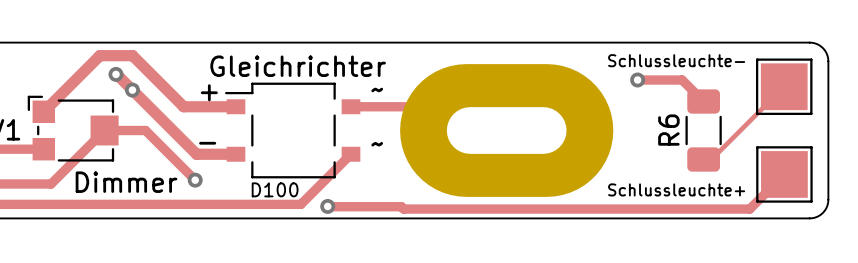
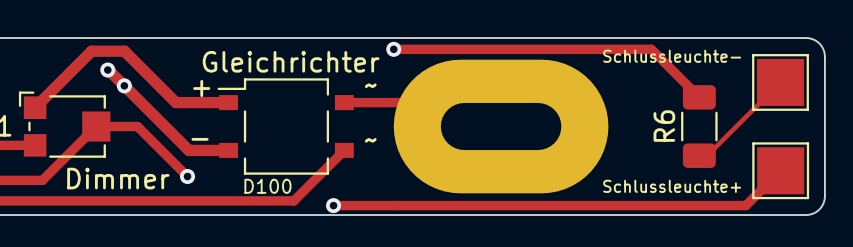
via: none -> (393, 49)
track: (637, 80) (682, 80) -> (393, 49) (651, 49) (677, 75)
via: (637, 80) -> none
track: (327, 206) (401, 206) (403, 209) -> (333, 205) (397, 205)
via position: (327, 206) -> (333, 205)

